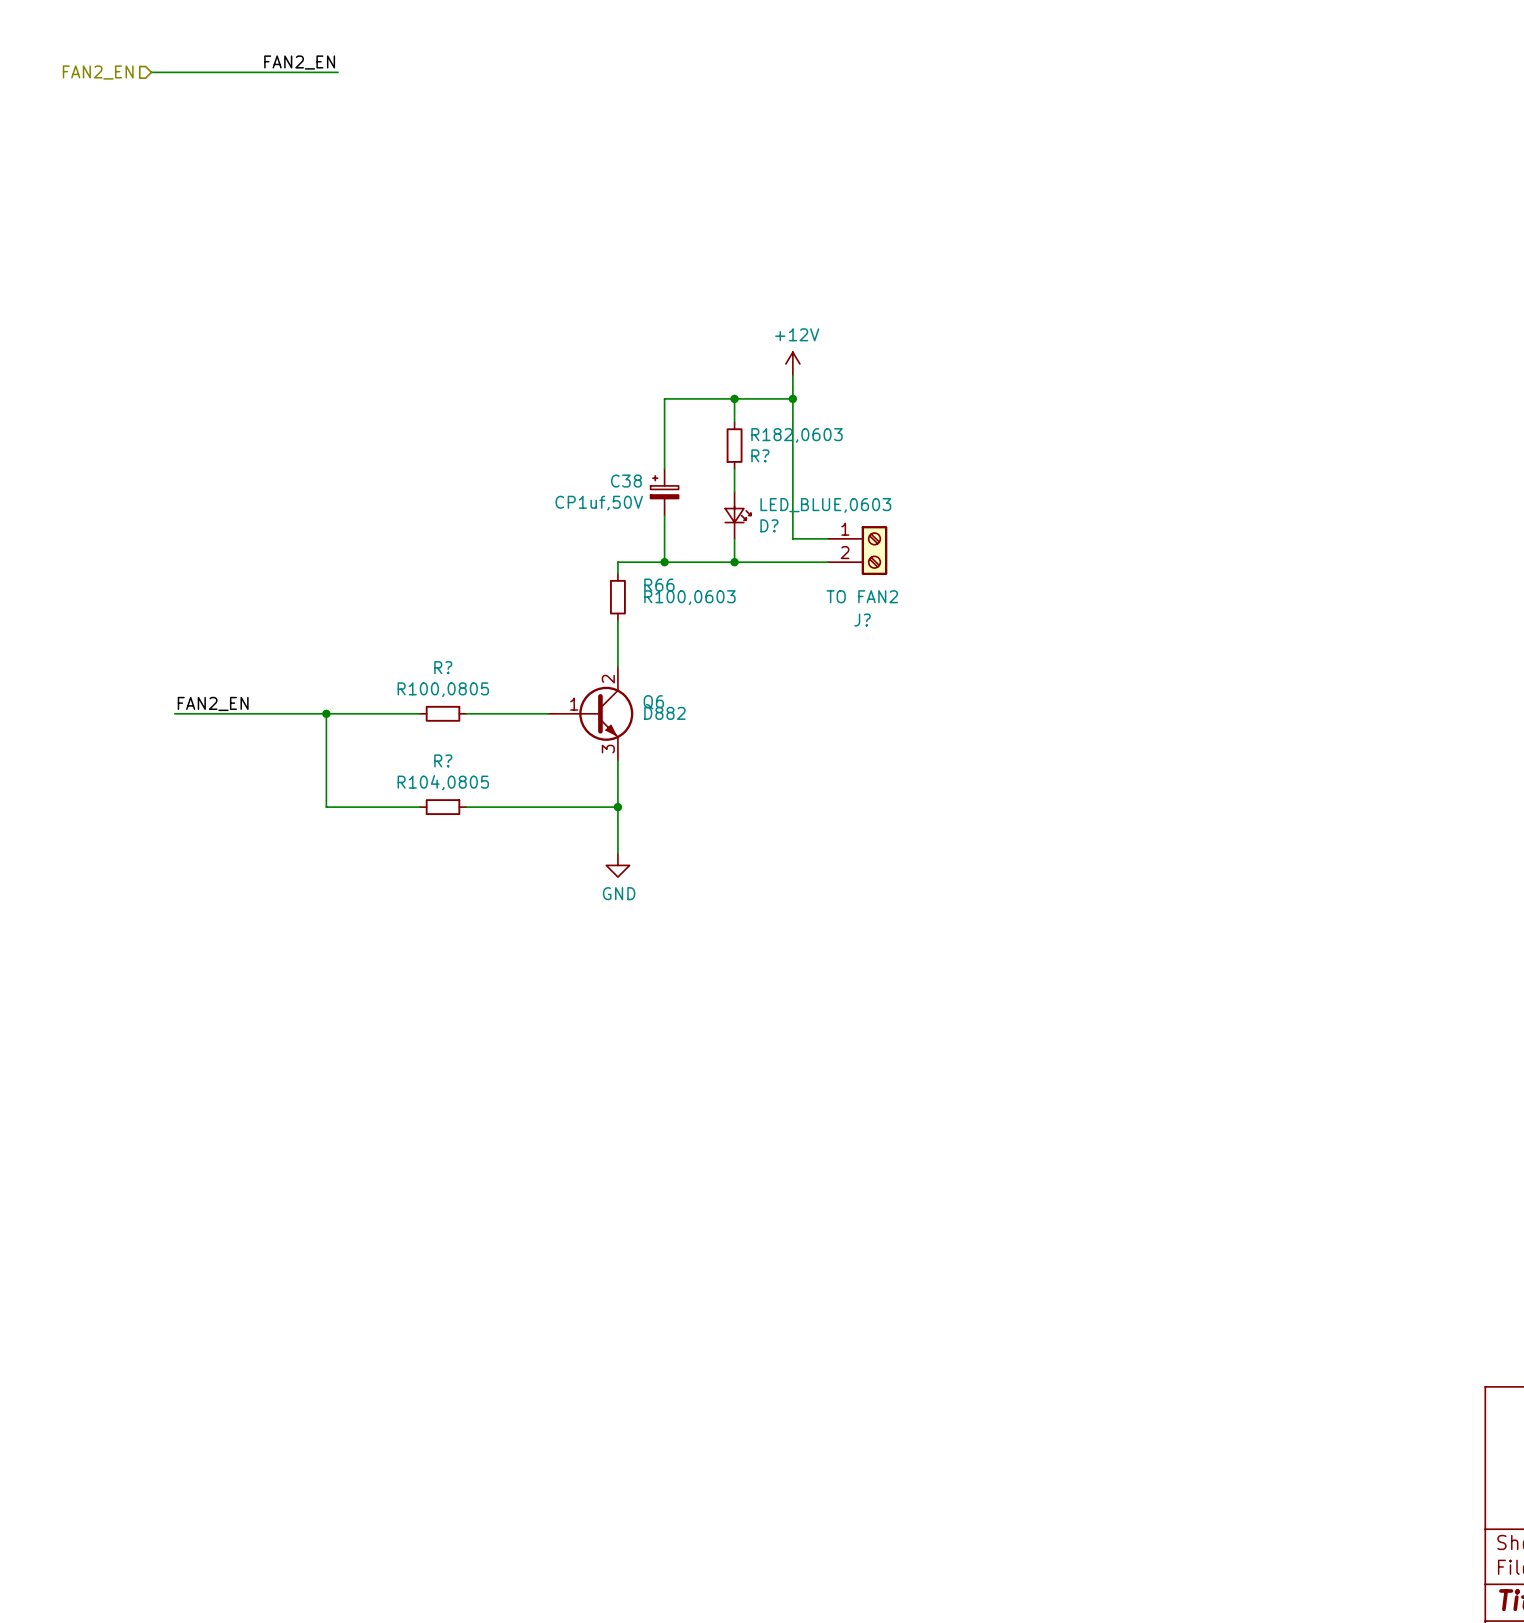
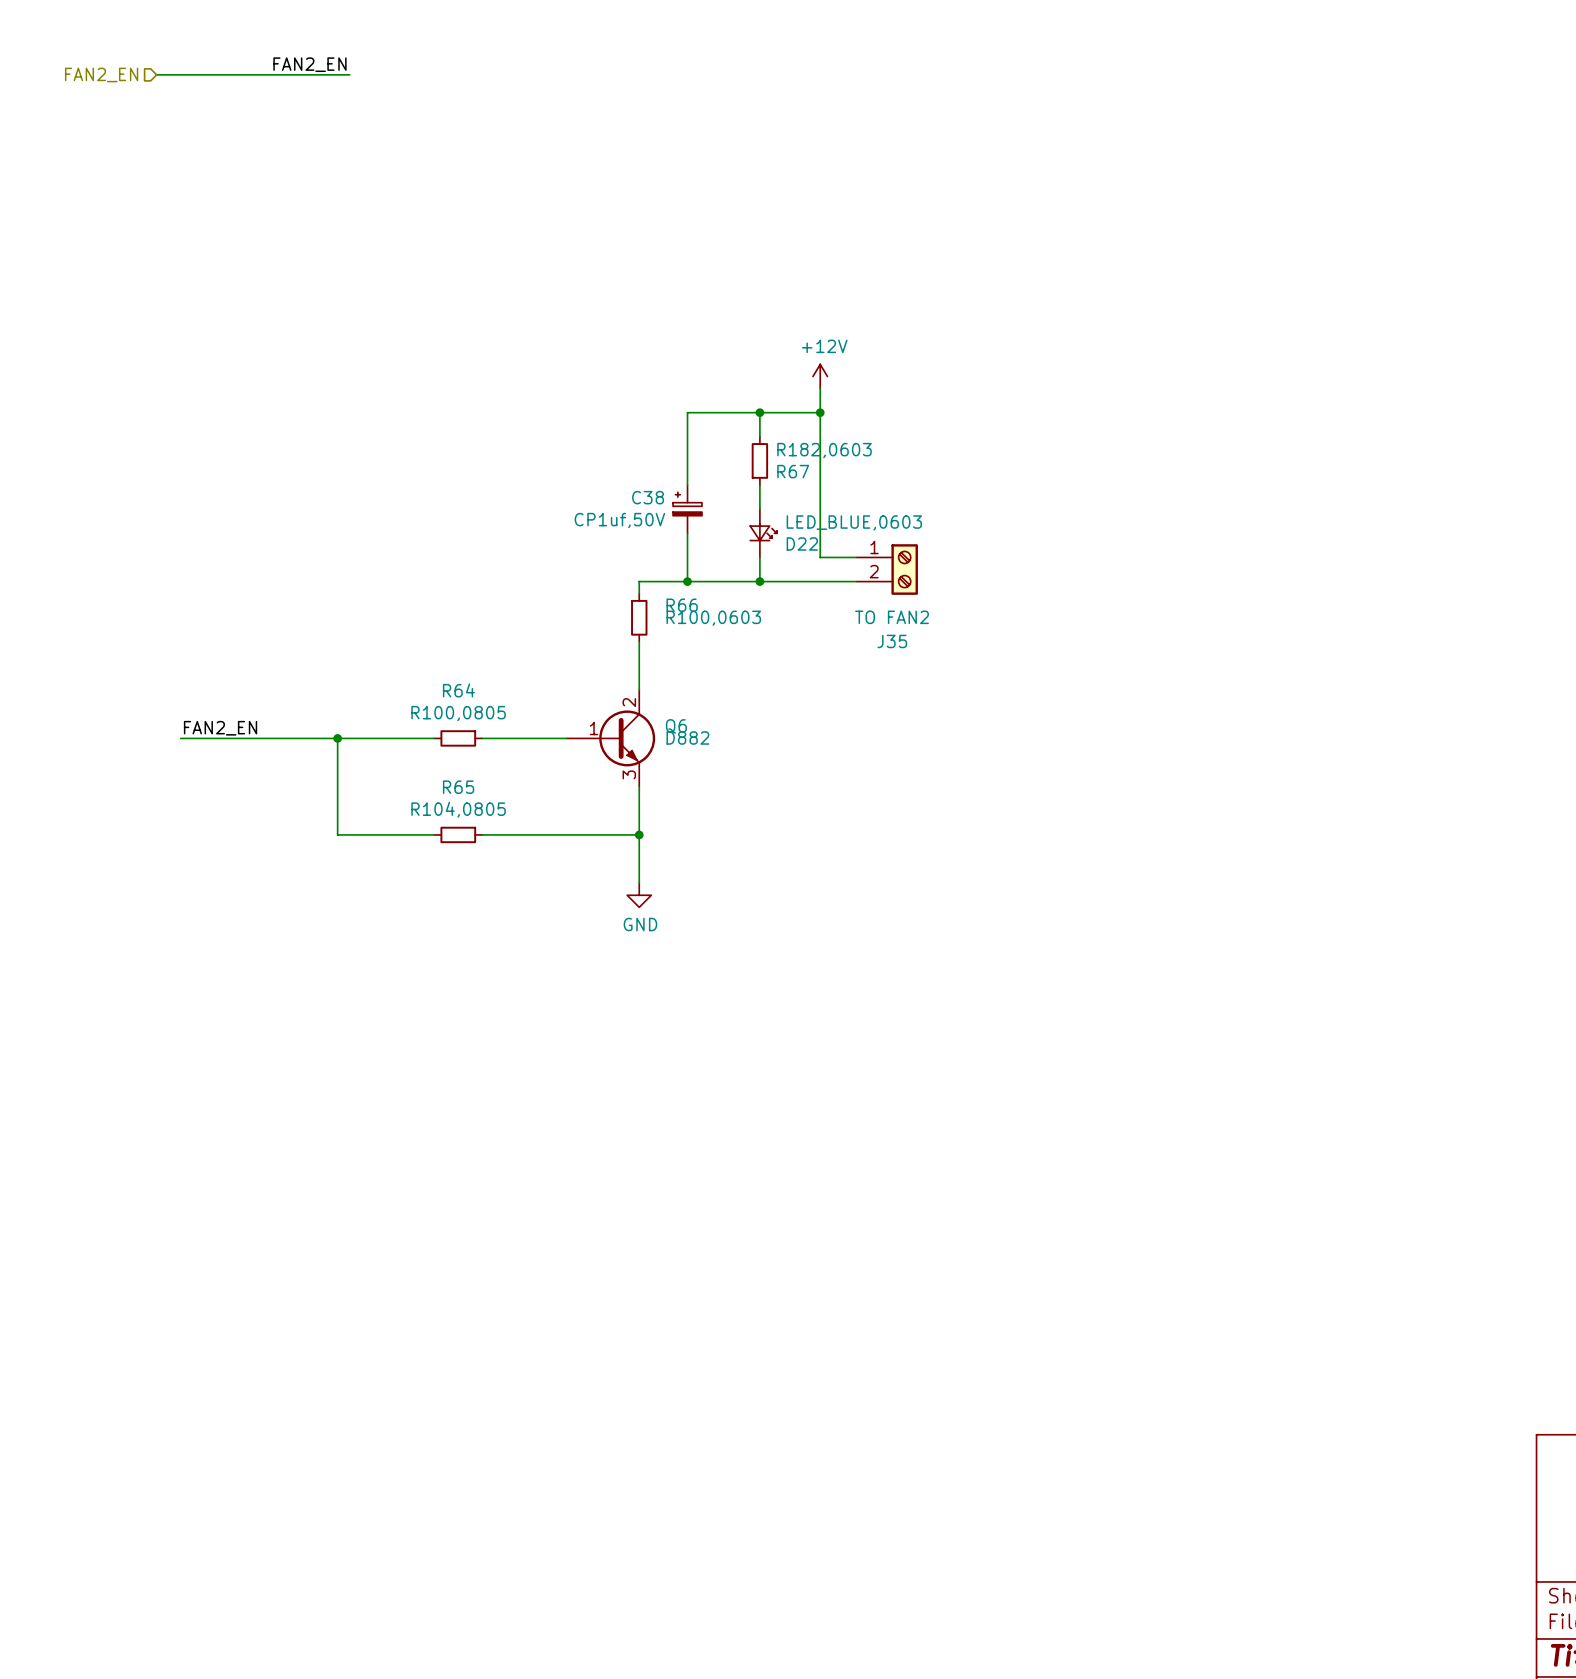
R? name: R? (760, 455) -> R67 (793, 471)
D? name: D? (769, 525) -> D22 (802, 543)
J? name: J? (862, 620) -> J35 (892, 641)
R? name: R? (443, 667) -> R64 (458, 690)
R? name: R? (443, 760) -> R65 (458, 787)

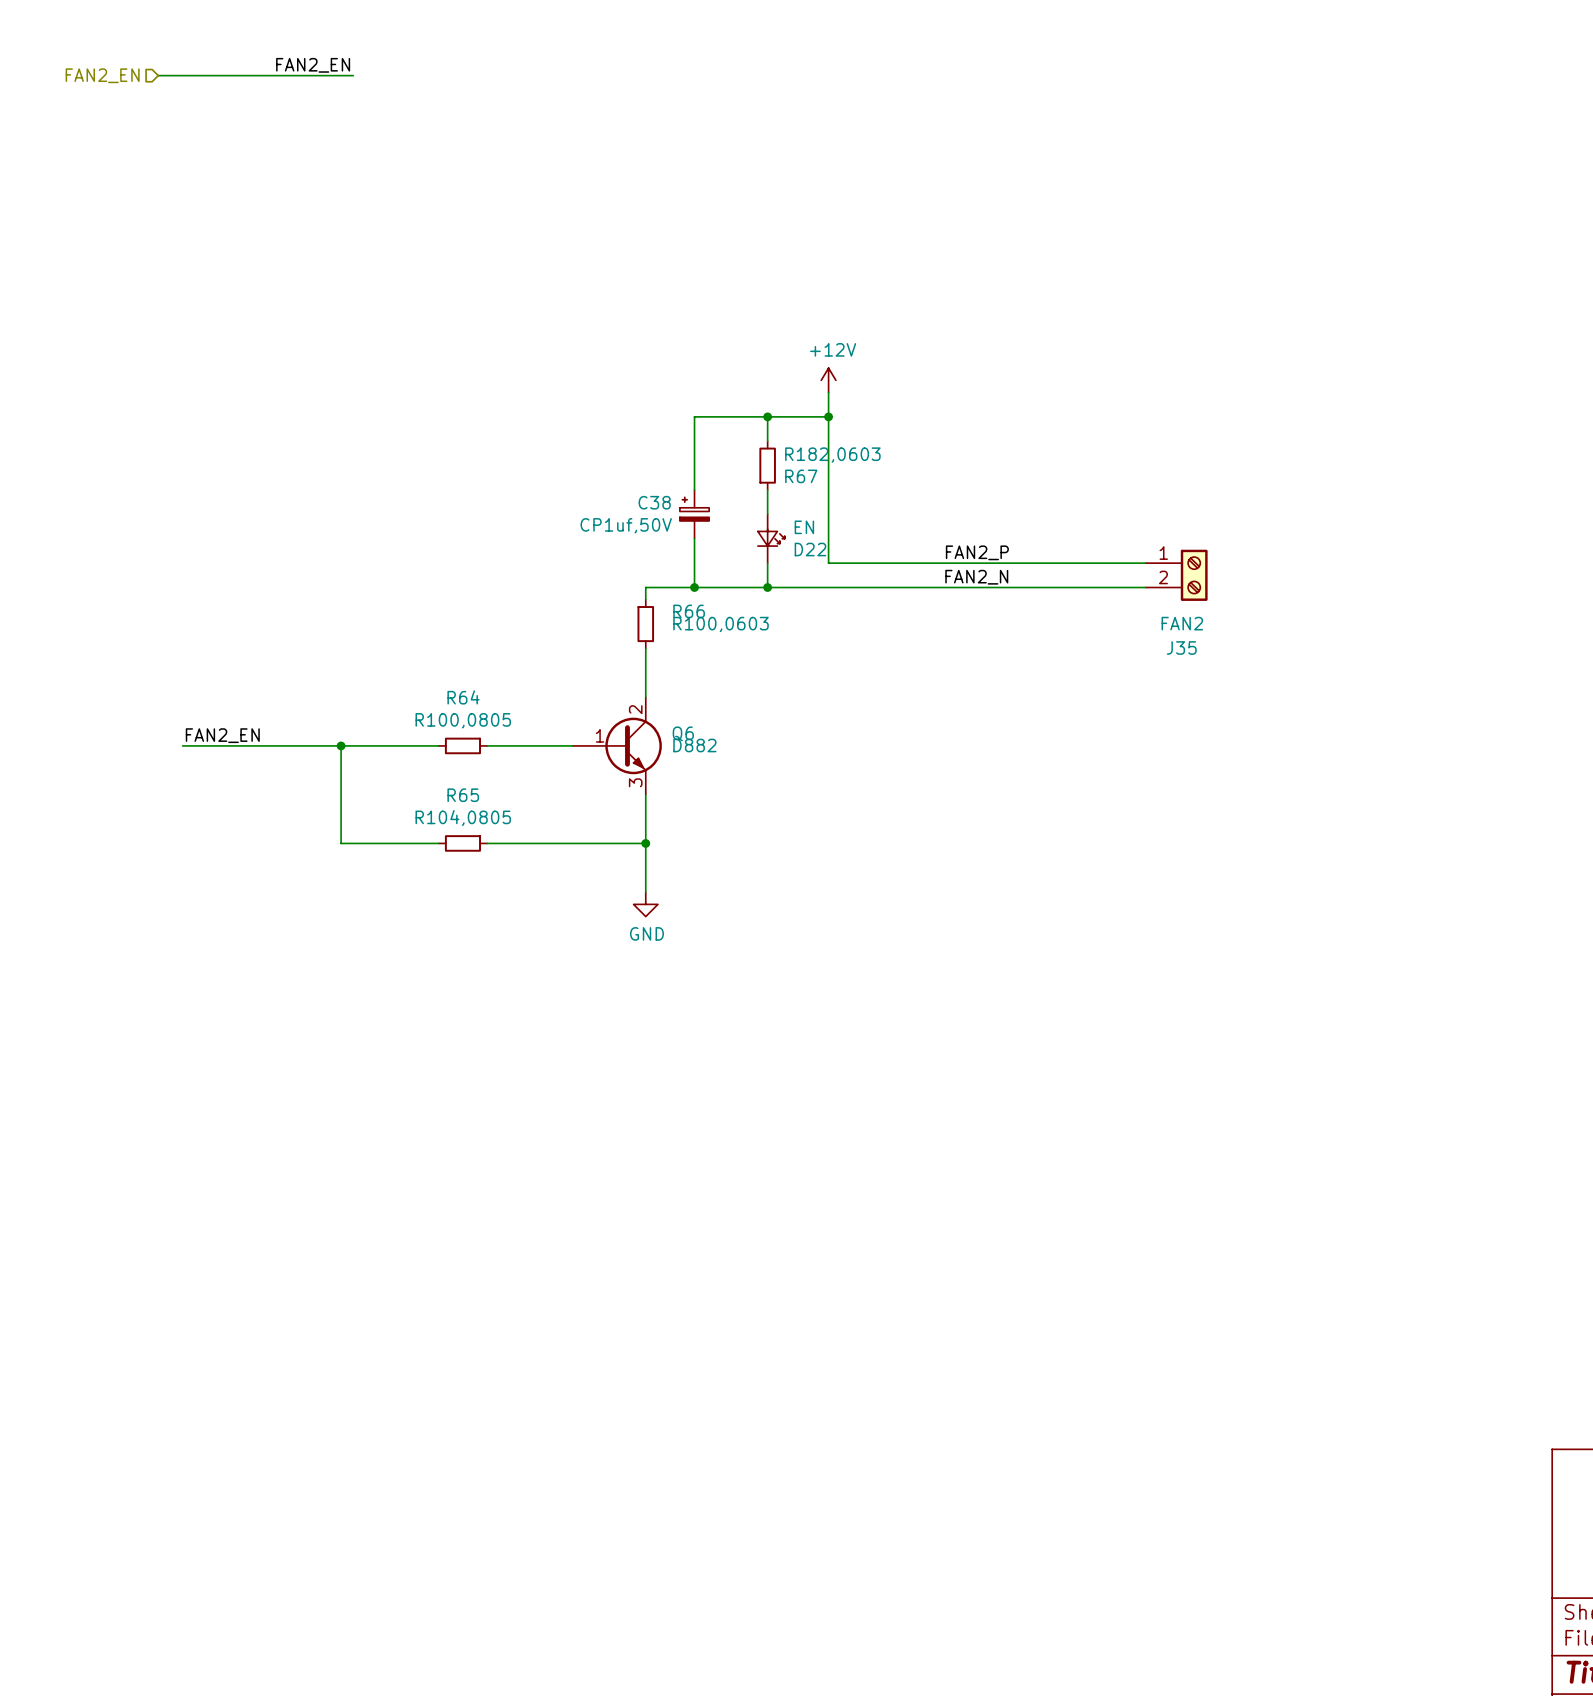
D22 value: LED_BLUE,0603 (854, 522) -> EN (804, 527)
label: none -> FAN2_P (977, 552)
wire: none -> (865, 563) (1145, 563)
J35 position: (887, 569) -> (1176, 575)
label: none -> FAN2_N (976, 577)
wire: none -> (865, 587) (1145, 587)
J35 value: TO FAN2 (892, 617) -> FAN2 (1182, 623)

